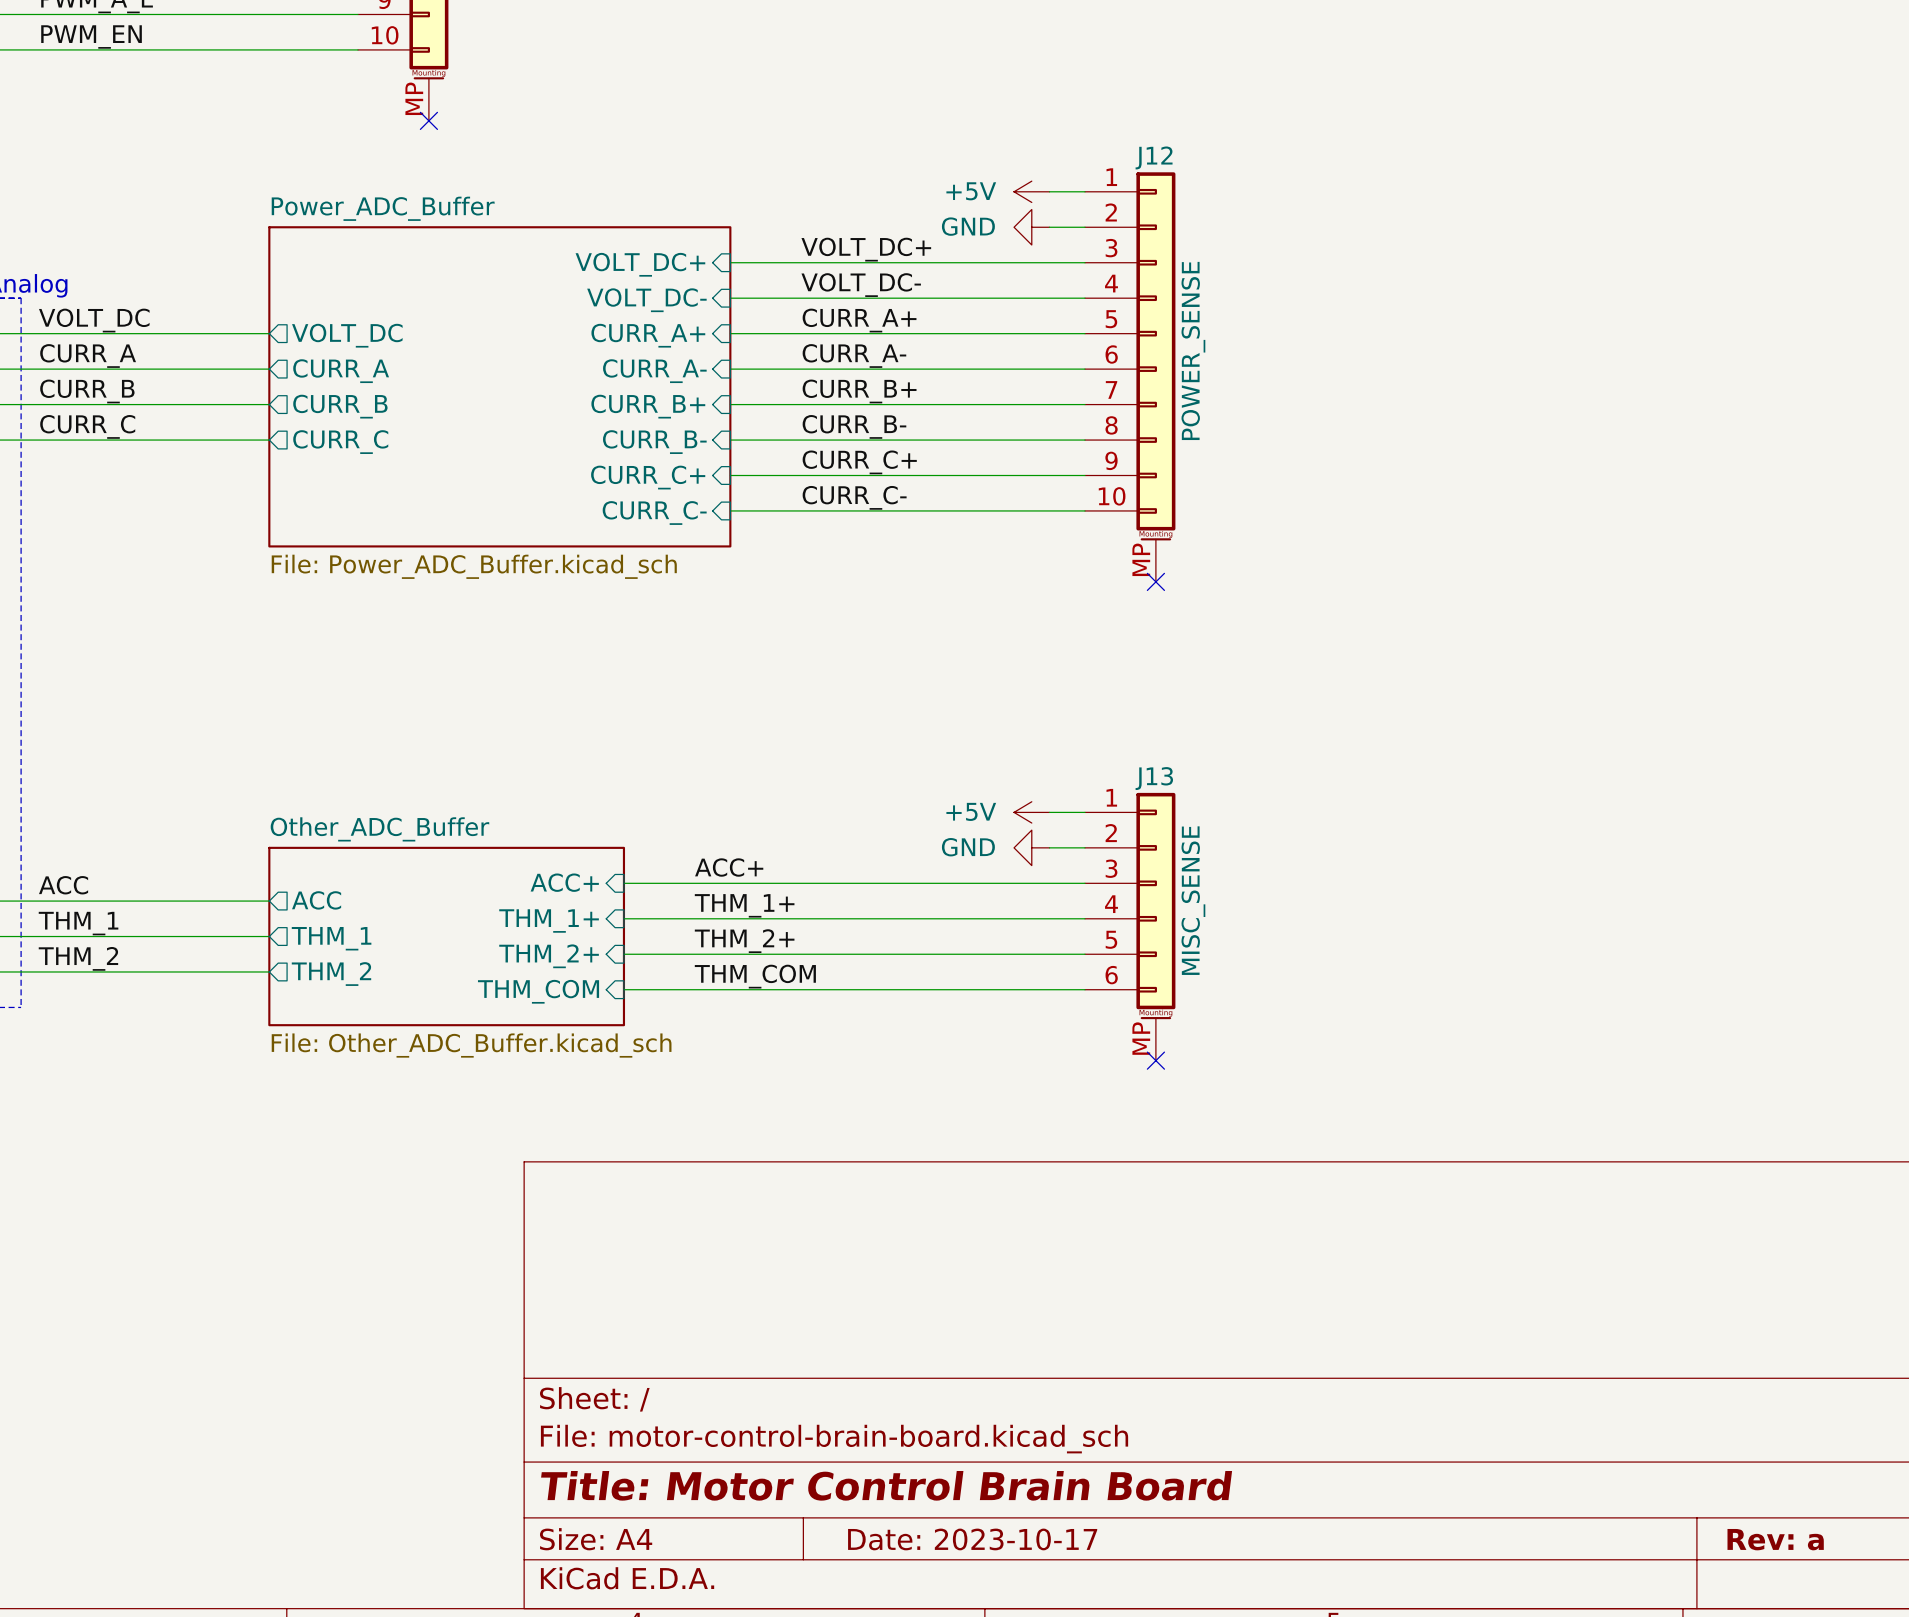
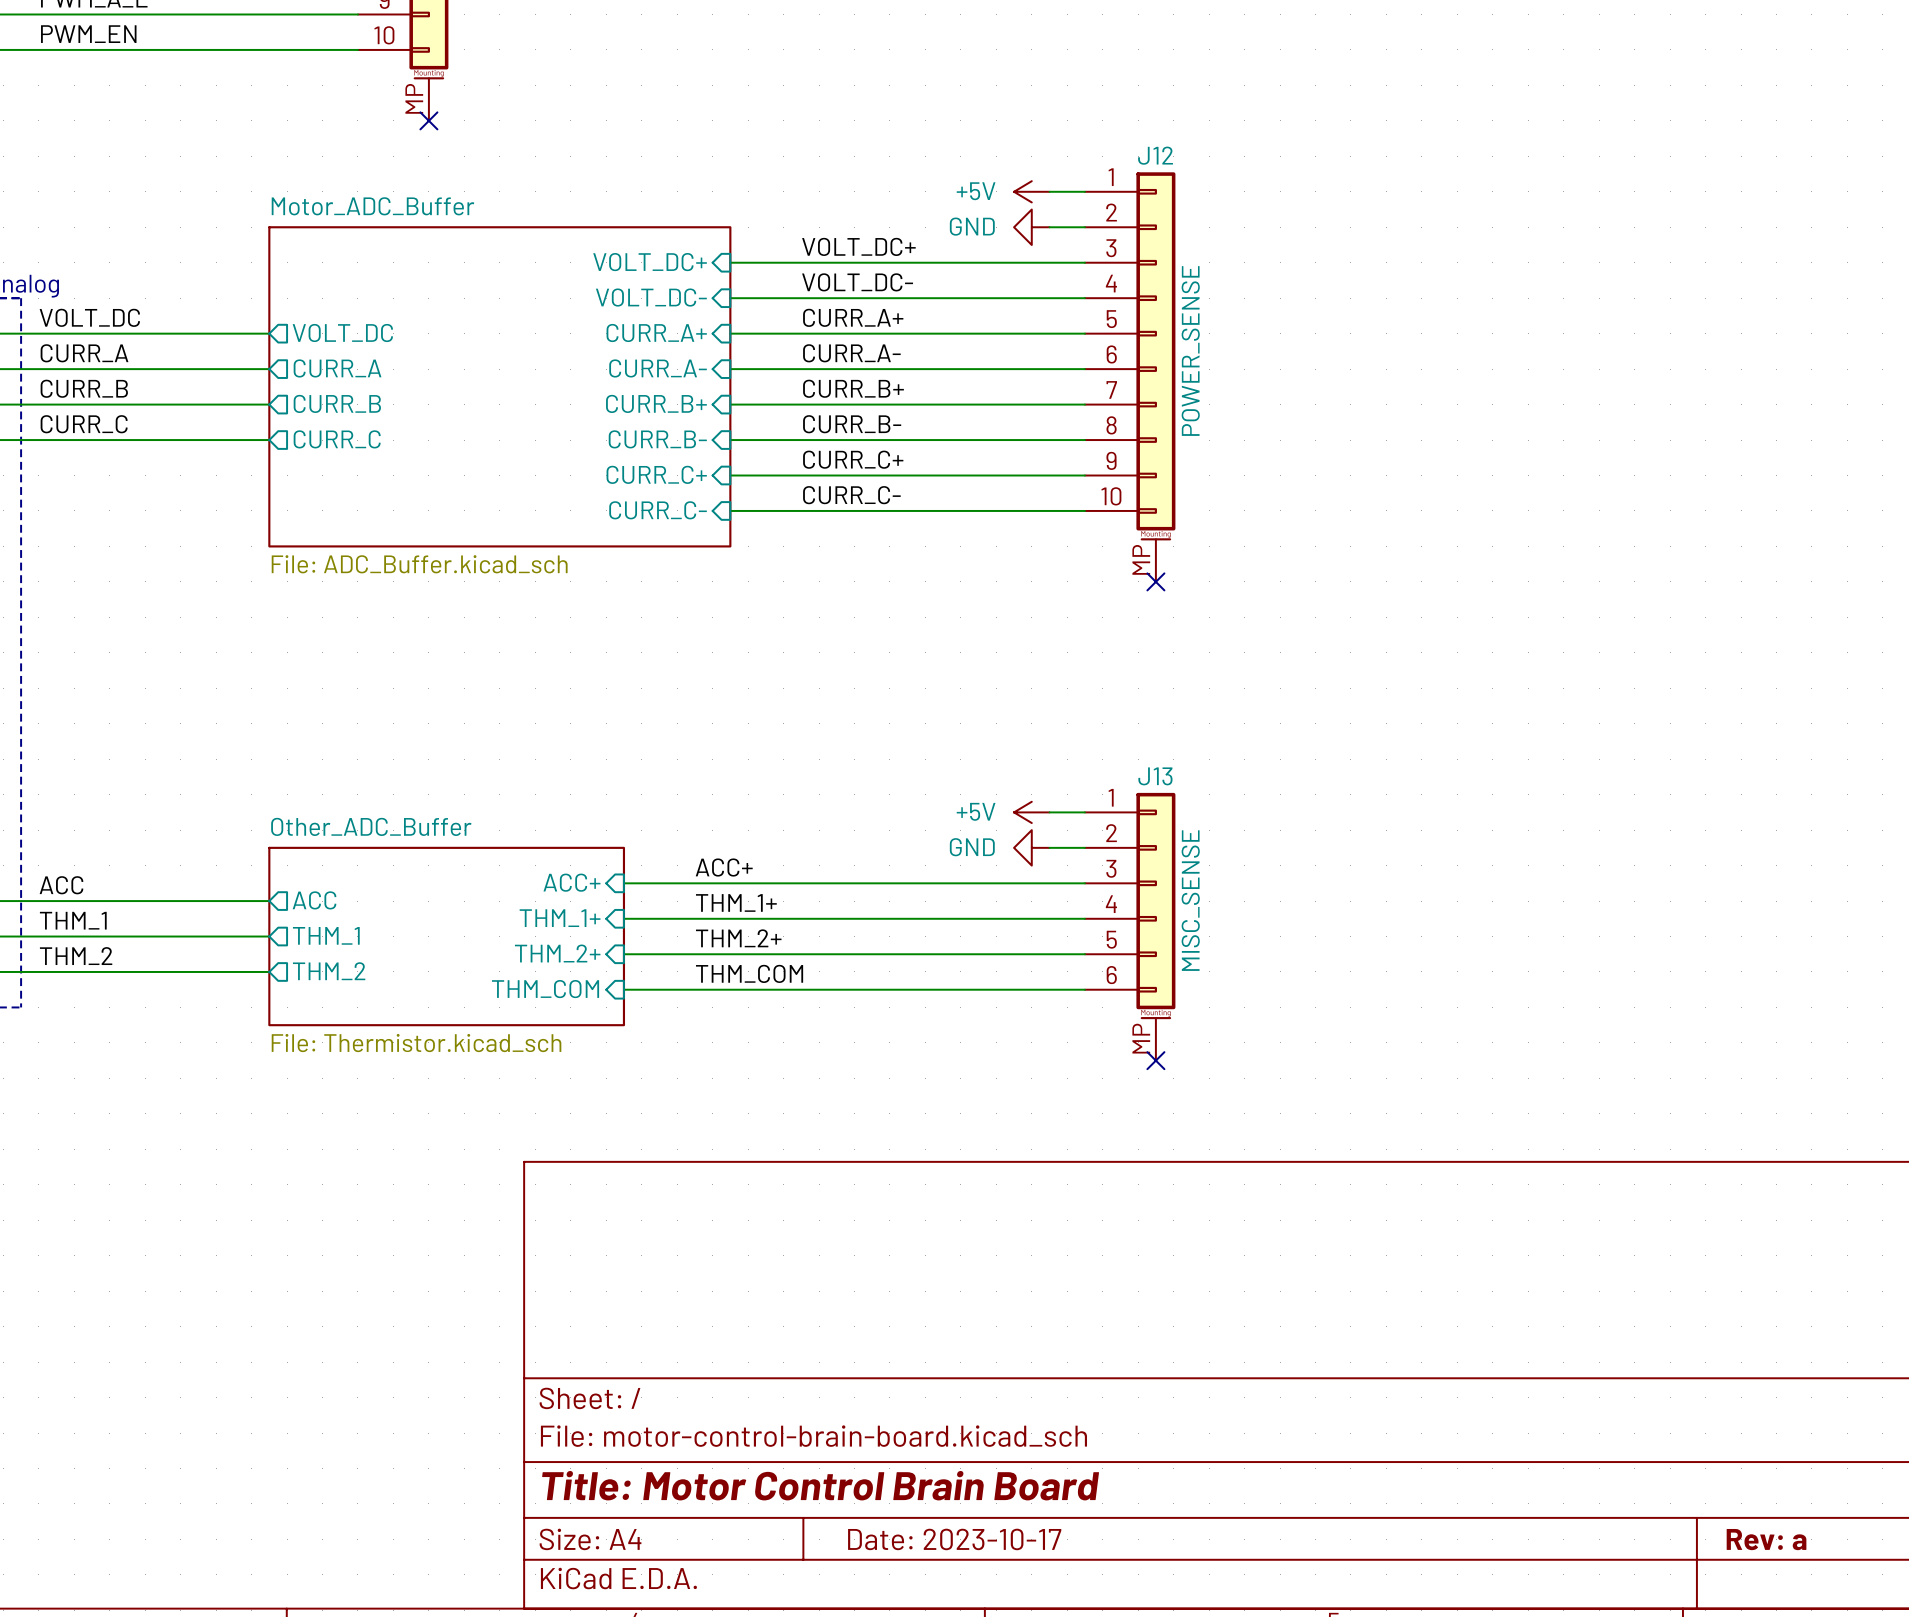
sheet Power_ADC_Buffer name: Power_ADC_Buffer (383, 208) -> Motor_ADC_Buffer (372, 206)
sheet Power_ADC_Buffer value: File: Power_ADC_Buffer.kicad_sch (474, 566) -> File: ADC_Buffer.kicad_sch (419, 564)
sheet Other_ADC_Buffer value: File: Other_ADC_Buffer.kicad_sch (471, 1045) -> File: Thermistor.kicad_sch (416, 1043)

